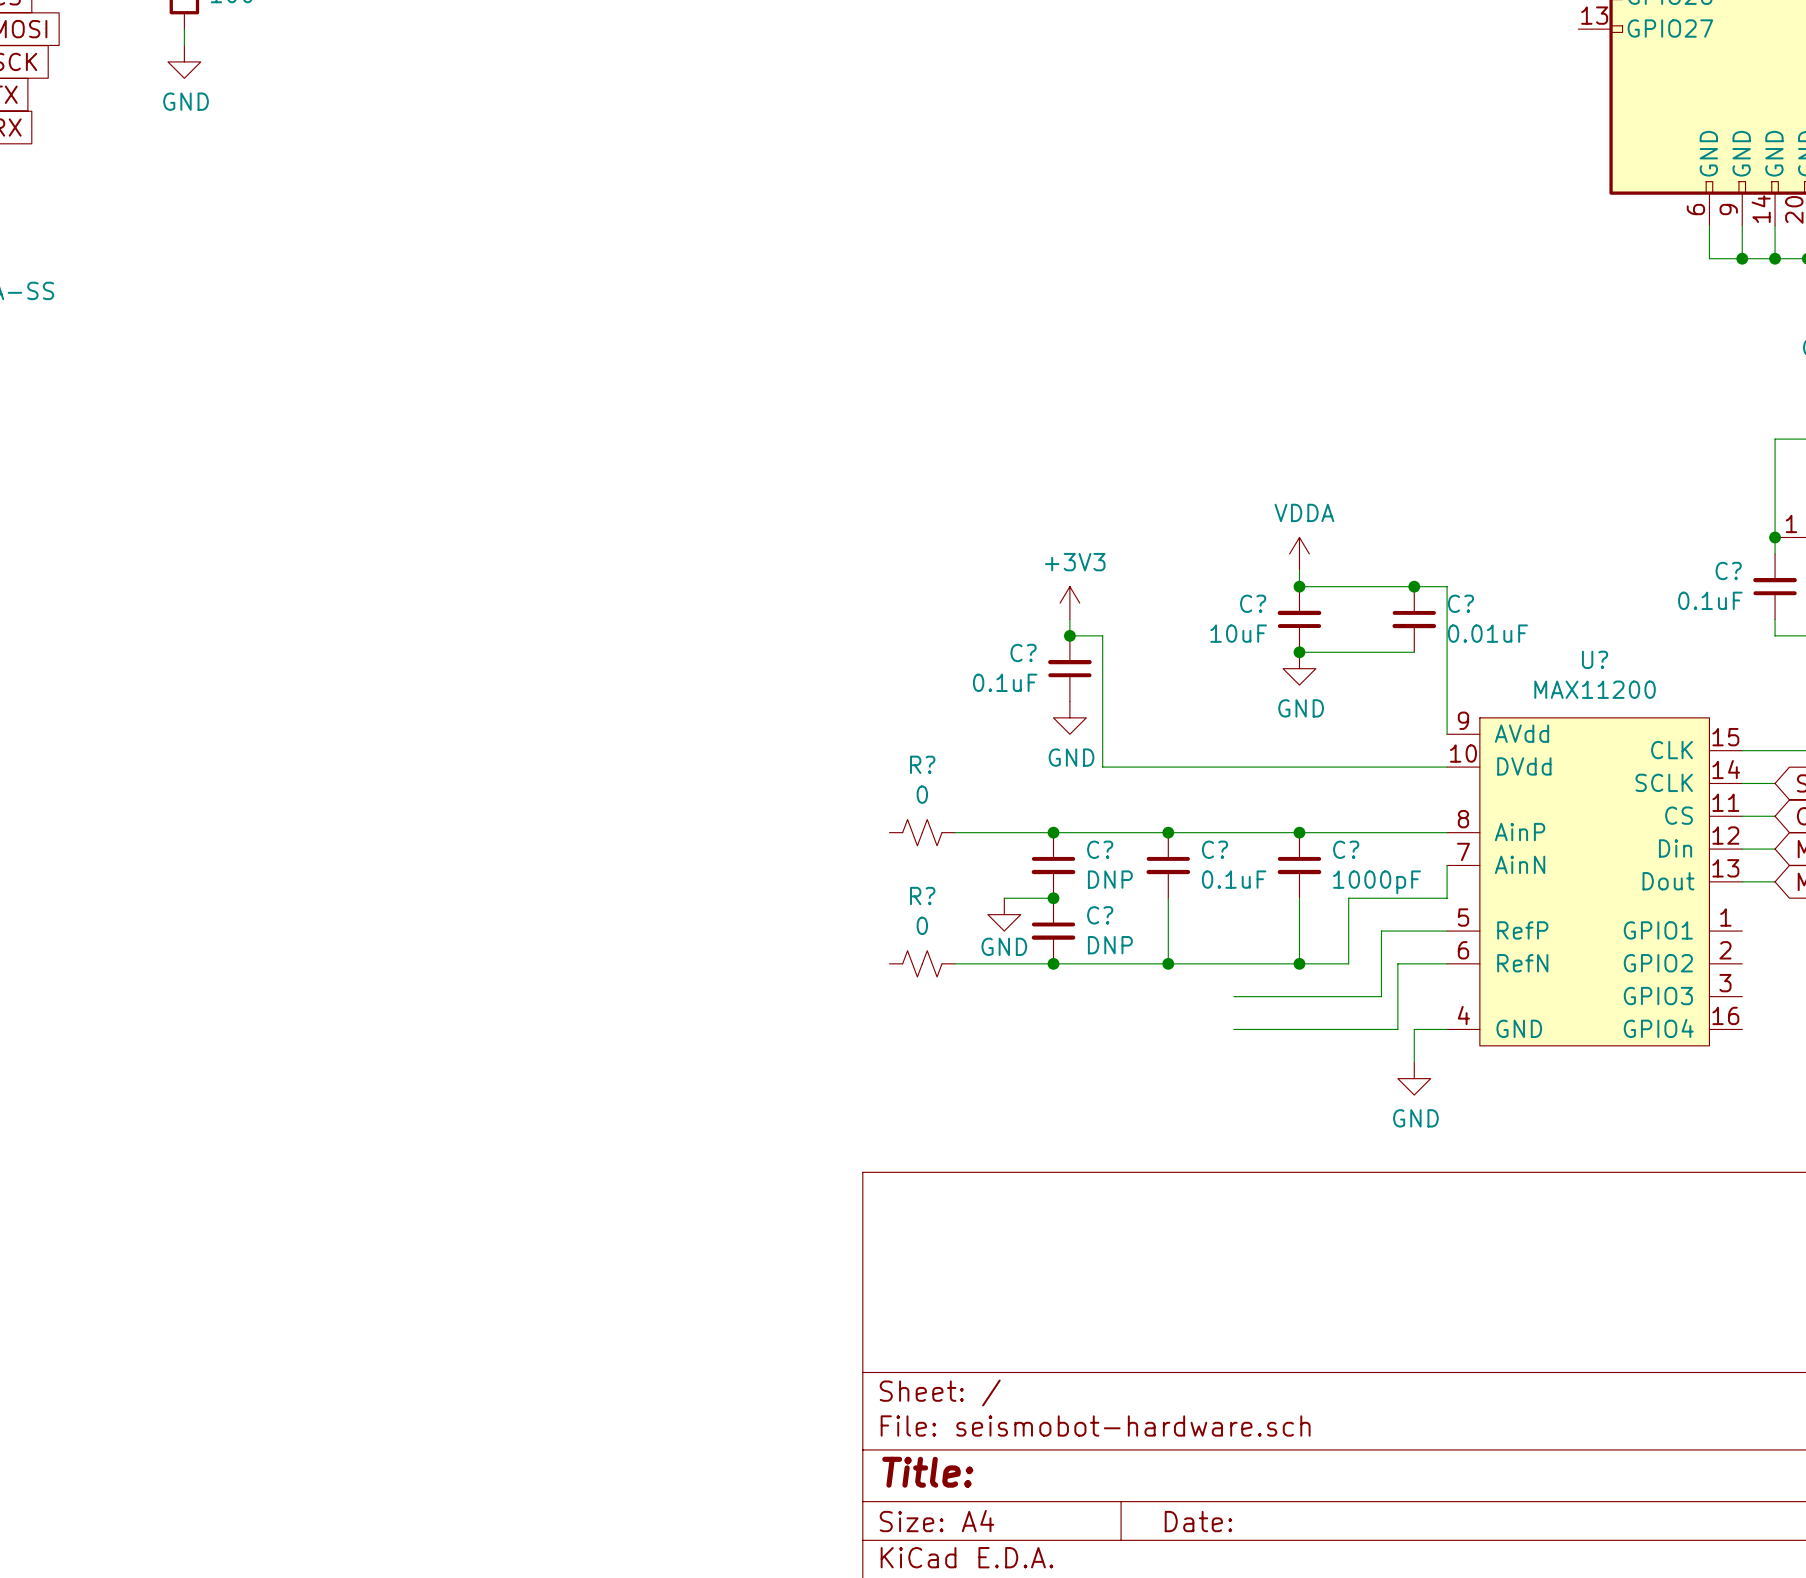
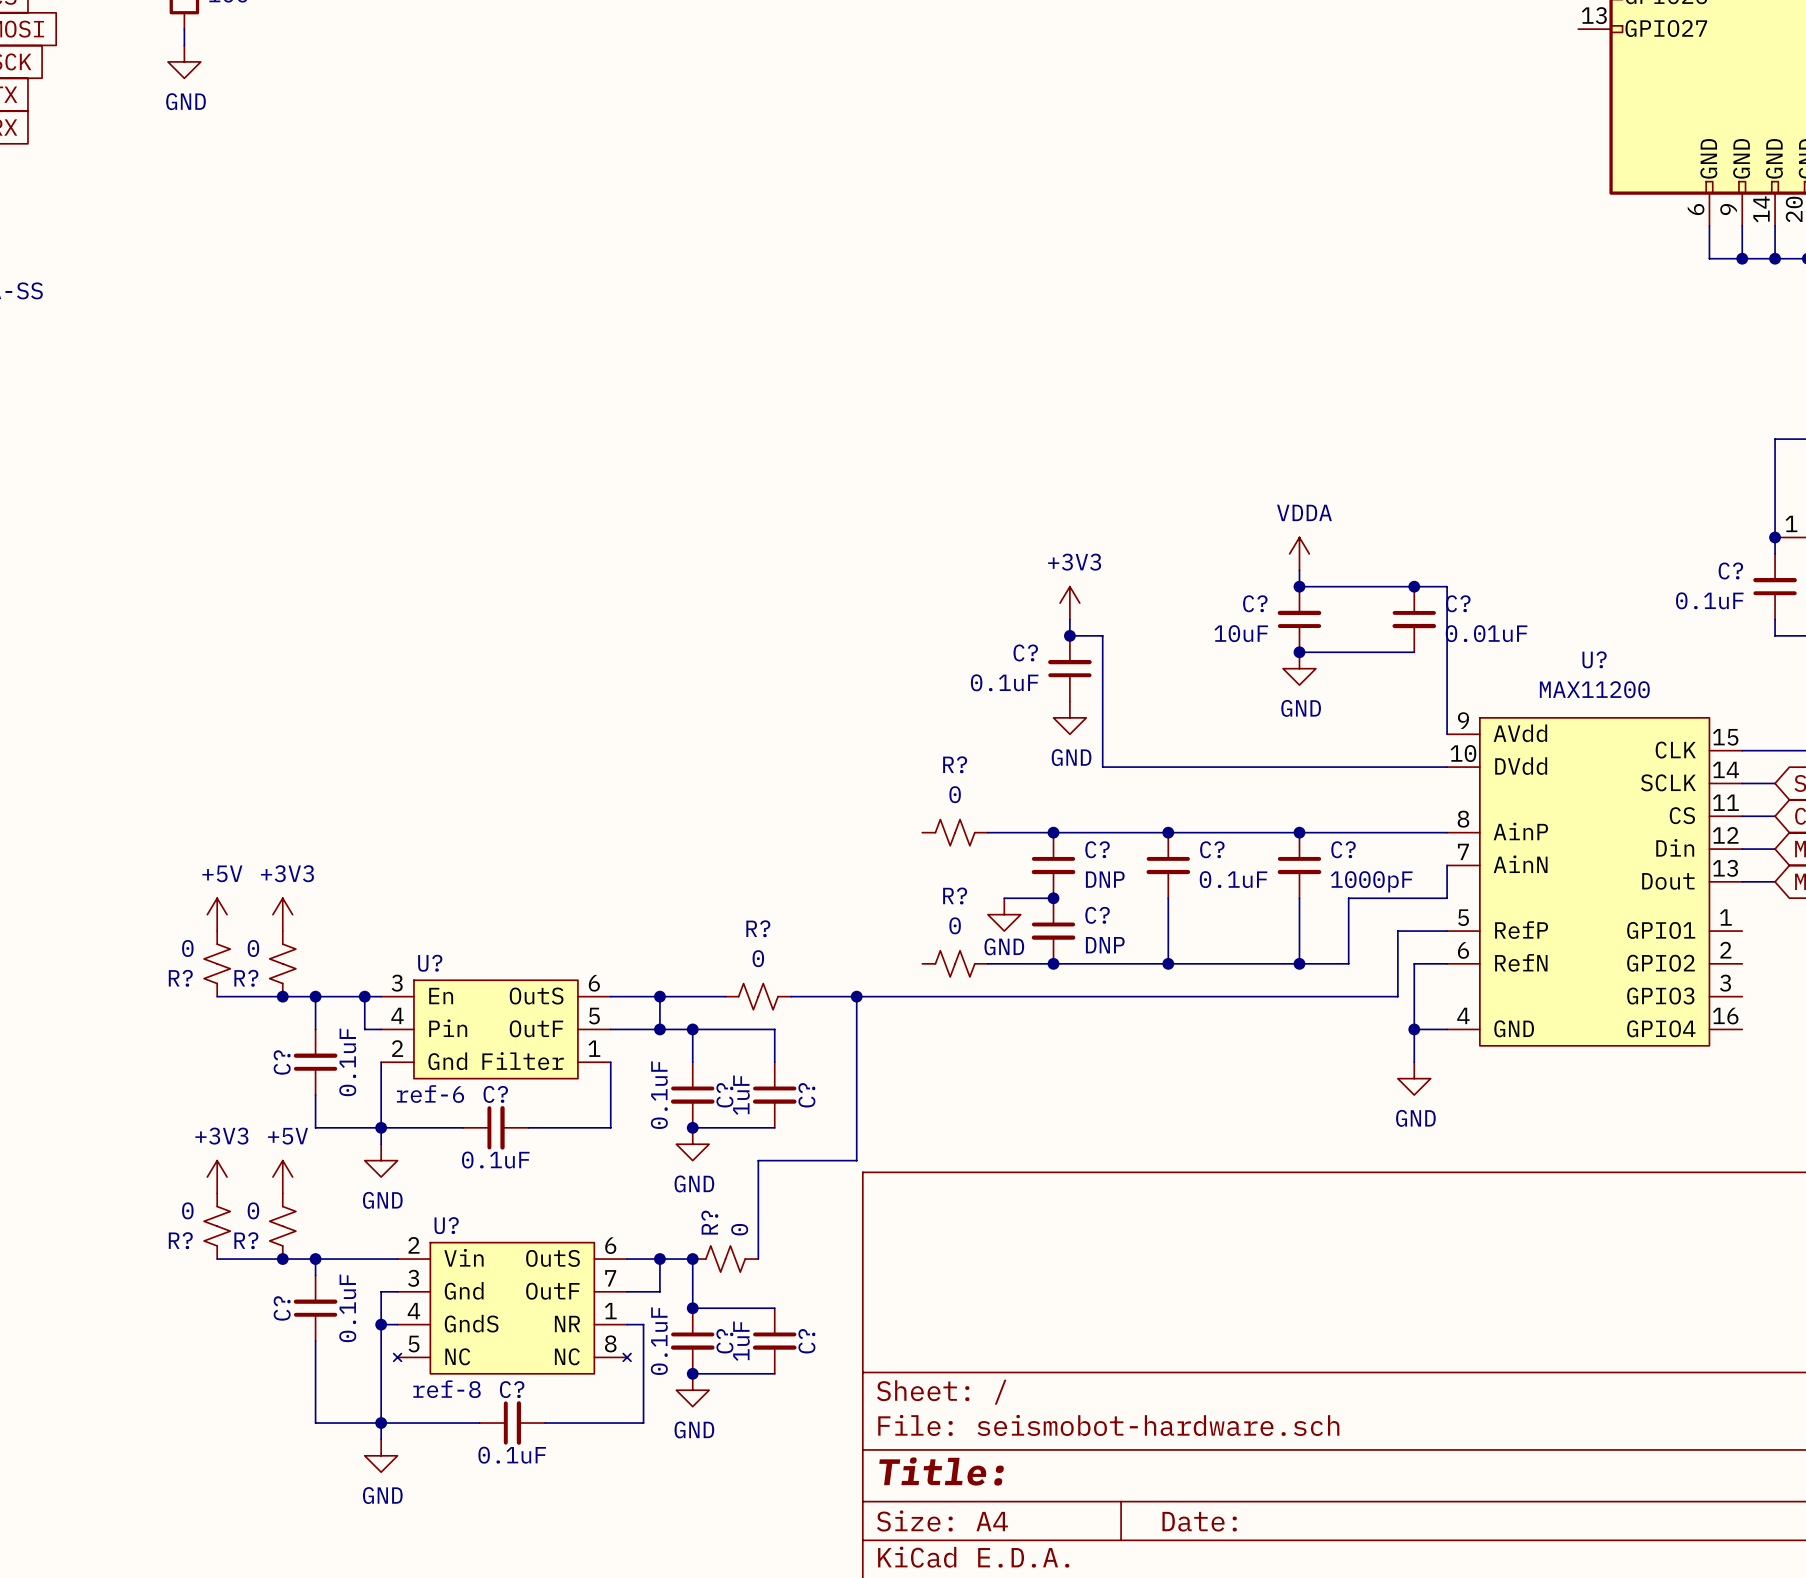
R? position: (922, 832) -> (955, 832)
wire: (955, 832) (987, 832) -> none
power symbol: none -> +5V (217, 914)
power symbol: none -> +3V3 (282, 914)
wire: (1397, 931) (1381, 931) (1381, 996) -> (1397, 931) (1397, 963)
R?: none -> 0 (217, 963)
R?: none -> 0 (282, 963)
R? position: (922, 963) -> (955, 963)
wire: (955, 963) (987, 963) -> none
wire: (1397, 963) (1414, 963) -> (1414, 1029) (1414, 963)
wire: none -> (217, 996) (381, 996)
junction: none -> (282, 996)
wire: none -> (315, 996) (315, 1029)
junction: none -> (315, 996)
wire: none -> (364, 996) (364, 1029) (381, 1029)
junction: none -> (364, 996)
wire: none -> (610, 996) (725, 996)
wire: none -> (659, 996) (659, 1029)
junction: none -> (659, 996)
R?: none -> 0 (758, 996)
wire: none -> (791, 996) (1233, 996)
wire: none -> (856, 996) (856, 1160) (758, 1160) (758, 1259)
junction: none -> (856, 996)
wire: (1397, 996) (1397, 1029) (1233, 1029) -> (1397, 996) (1381, 996)
U?: none -> ref-6 (495, 1029)
wire: none -> (610, 1029) (774, 1029) (774, 1062)
junction: none -> (659, 1029)
wire: none -> (692, 1029) (692, 1062)
junction: none -> (692, 1029)
junction: none -> (1414, 1029)
C?: none -> 0.1uF (315, 1062)
wire: none -> (381, 1062) (381, 1144)
wire: none -> (610, 1062) (610, 1127) (528, 1127)
wire: none -> (315, 1095) (315, 1127) (463, 1127)
C?: none -> 0.1uF (692, 1095)
C?: none -> 1uF (774, 1095)
junction: none -> (381, 1127)
C?: none -> 0.1uF (495, 1127)
wire: none -> (692, 1127) (774, 1127)
junction: none -> (692, 1127)
power symbol: none -> GND (692, 1144)
power symbol: none -> GND (381, 1160)
power symbol: none -> +3V3 (217, 1177)
power symbol: none -> +5V (282, 1177)
R?: none -> 0 (217, 1226)
R?: none -> 0 (282, 1226)
wire: none -> (217, 1259) (397, 1259)
junction: none -> (282, 1259)
wire: none -> (315, 1259) (315, 1275)
junction: none -> (315, 1259)
wire: none -> (627, 1259) (692, 1259) (692, 1308) (774, 1308)
wire: none -> (659, 1259) (659, 1291) (627, 1291)
junction: none -> (659, 1259)
junction: none -> (692, 1259)
R?: none -> 0 (725, 1259)
wire: none -> (397, 1291) (381, 1291) (381, 1439)
C?: none -> 0.1uF (315, 1308)
U?: none -> ref-8 (512, 1308)
junction: none -> (692, 1308)
wire: none -> (381, 1324) (397, 1324)
junction: none -> (381, 1324)
wire: none -> (627, 1324) (643, 1324) (643, 1423) (545, 1423)
wire: none -> (315, 1341) (315, 1423) (479, 1423)
C?: none -> 0.1uF (692, 1341)
C?: none -> 1uF (774, 1341)
wire: none -> (692, 1373) (774, 1373)
junction: none -> (692, 1373)
power symbol: none -> GND (692, 1390)
junction: none -> (381, 1423)
C?: none -> 0.1uF (512, 1423)
power symbol: none -> GND (381, 1455)

